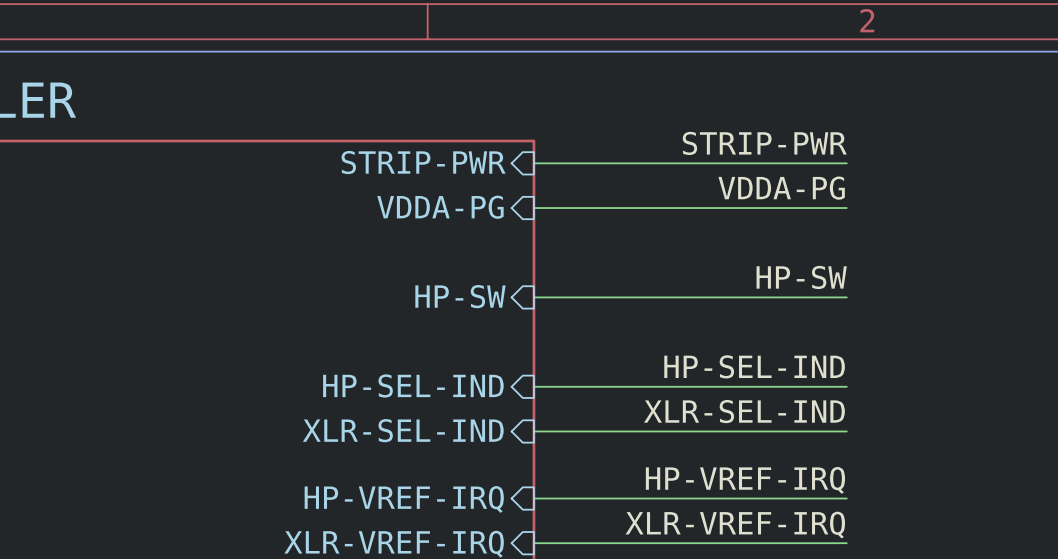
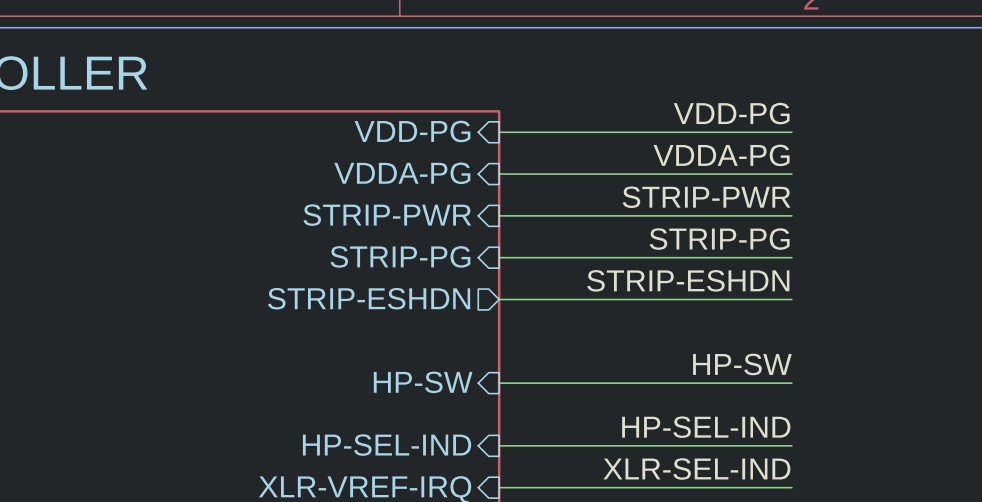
label: STRIP-PWR (764, 143) -> VDD-PG (731, 113)
sheet pin: STRIP-PWR (423, 162) -> VDD-PG (412, 131)
label: none -> STRIP-PWR (706, 197)
sheet pin: none -> STRIP-PWR (387, 215)
label: HP-SW (801, 277) -> STRIP-PG (719, 239)
sheet pin: HP-SW (460, 296) -> STRIP-PG (400, 256)
label: none -> STRIP-ESHDN (688, 280)
sheet pin: none -> STRIP-ESHDN (369, 298)
wire: none -> (499, 299) (791, 299)
label: HP-SEL-IND (754, 366) -> none
sheet pin: HP-SEL-IND (413, 385) -> none
wire: (533, 386) (846, 386) -> (499, 215) (791, 215)
label: XLR-SEL-IND (744, 411) -> HP-SW (742, 364)
sheet pin: XLR-SEL-IND (403, 430) -> HP-SW (423, 382)
label: HP-VREF-IRQ (745, 480) -> HP-SEL-IND (706, 427)
sheet pin: HP-VREF-IRQ (404, 499) -> HP-SEL-IND (387, 445)
label: XLR-VREF-IRQ (735, 525) -> XLR-SEL-IND (696, 468)

